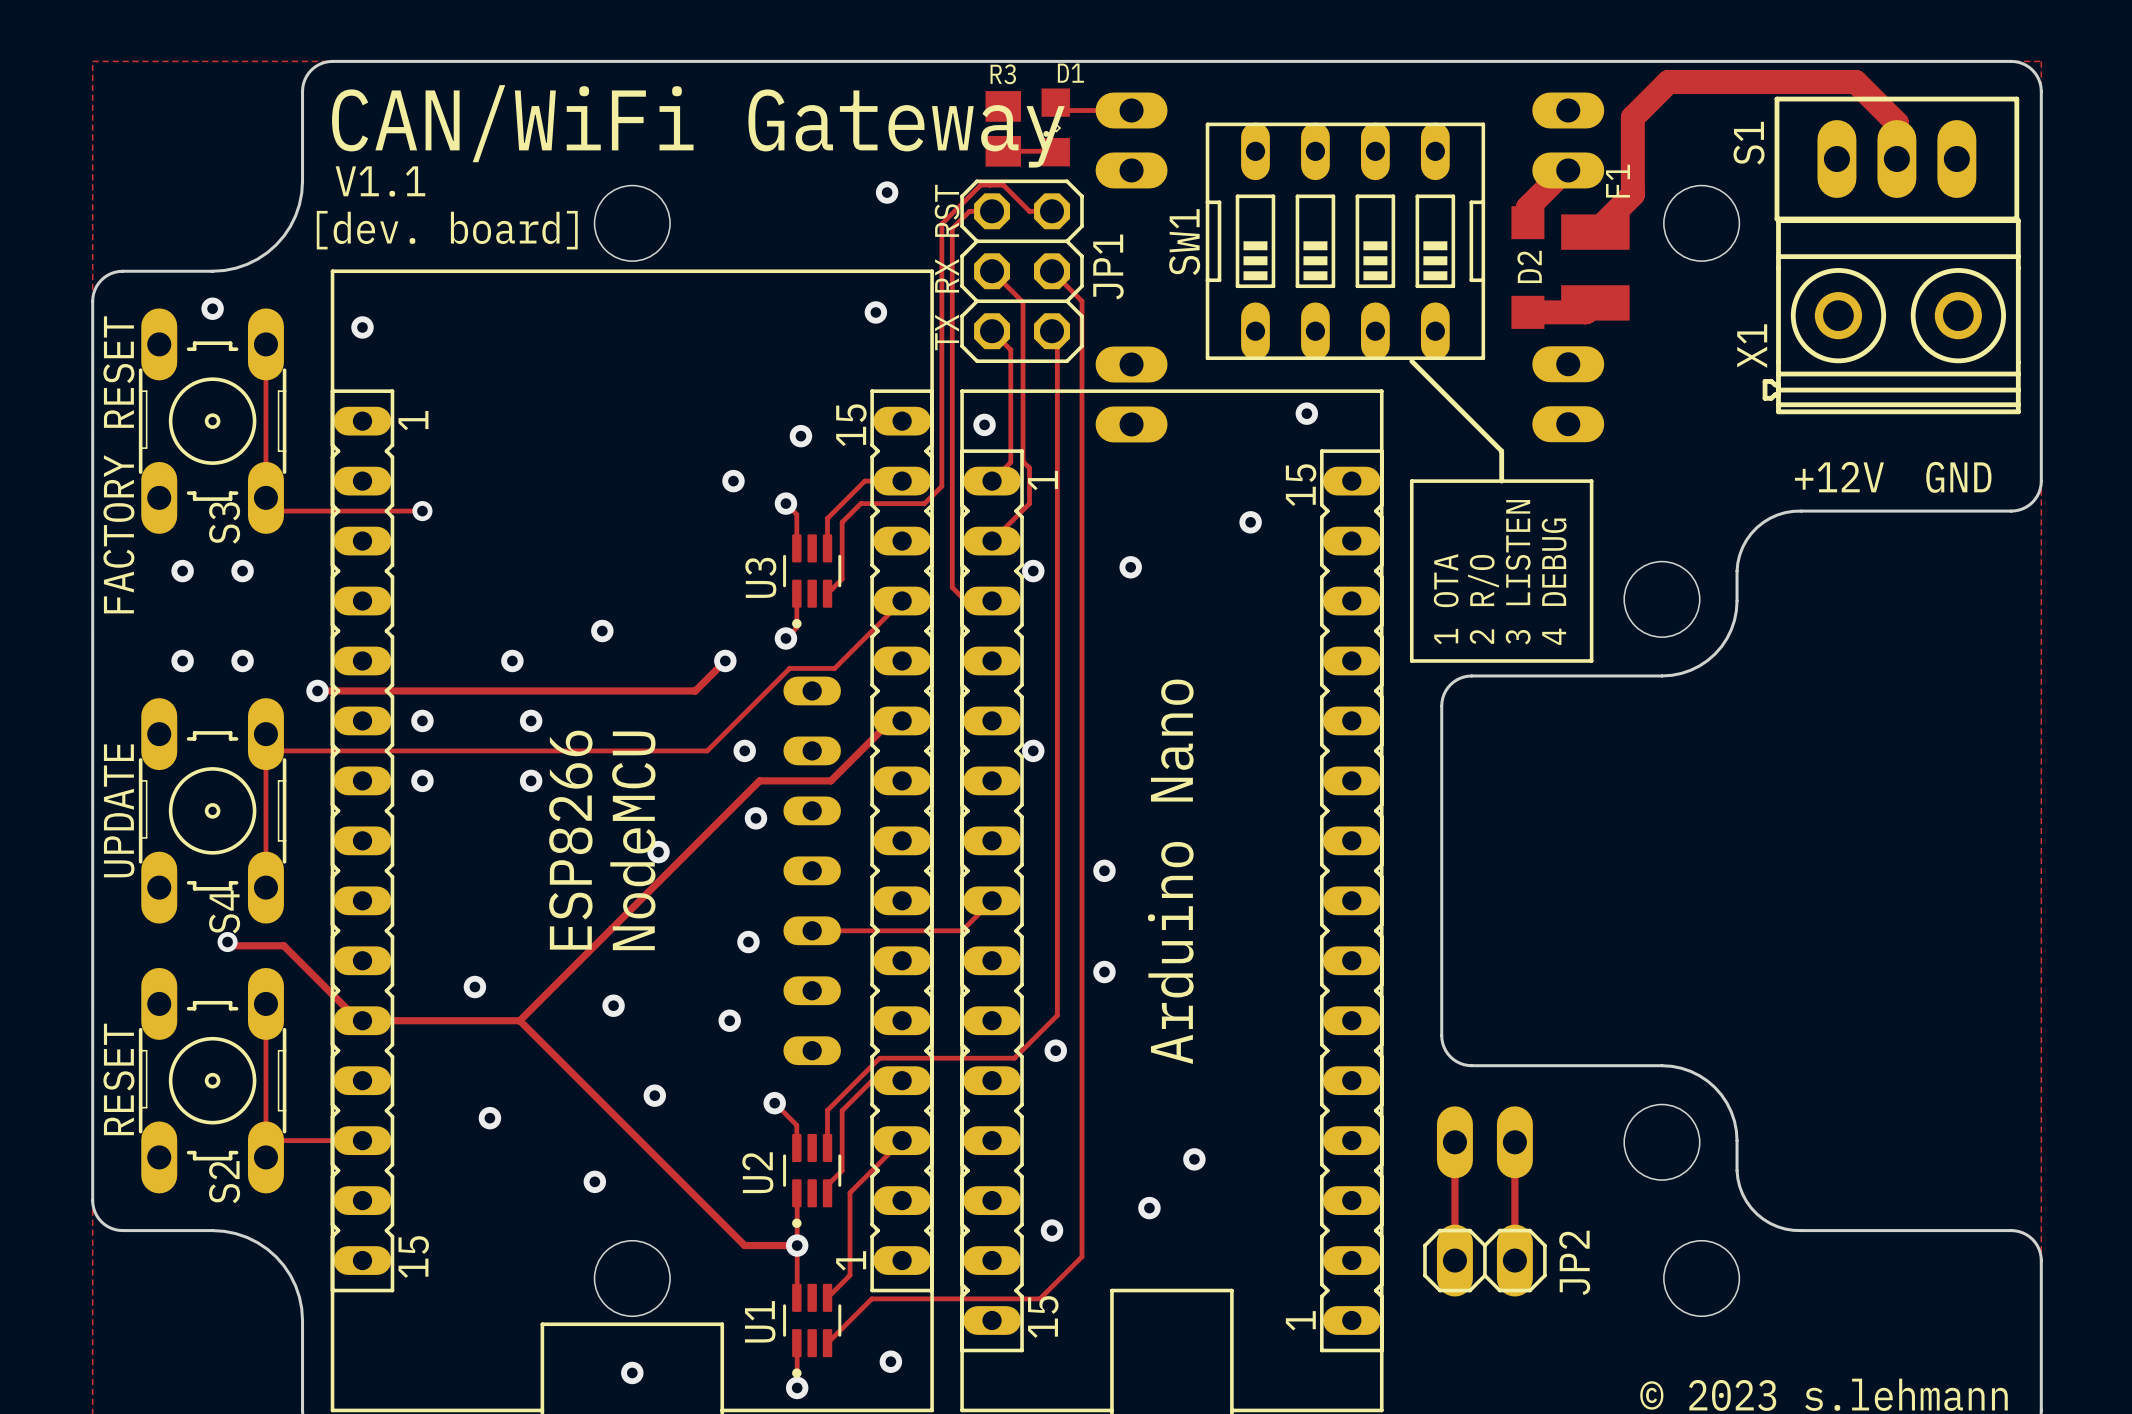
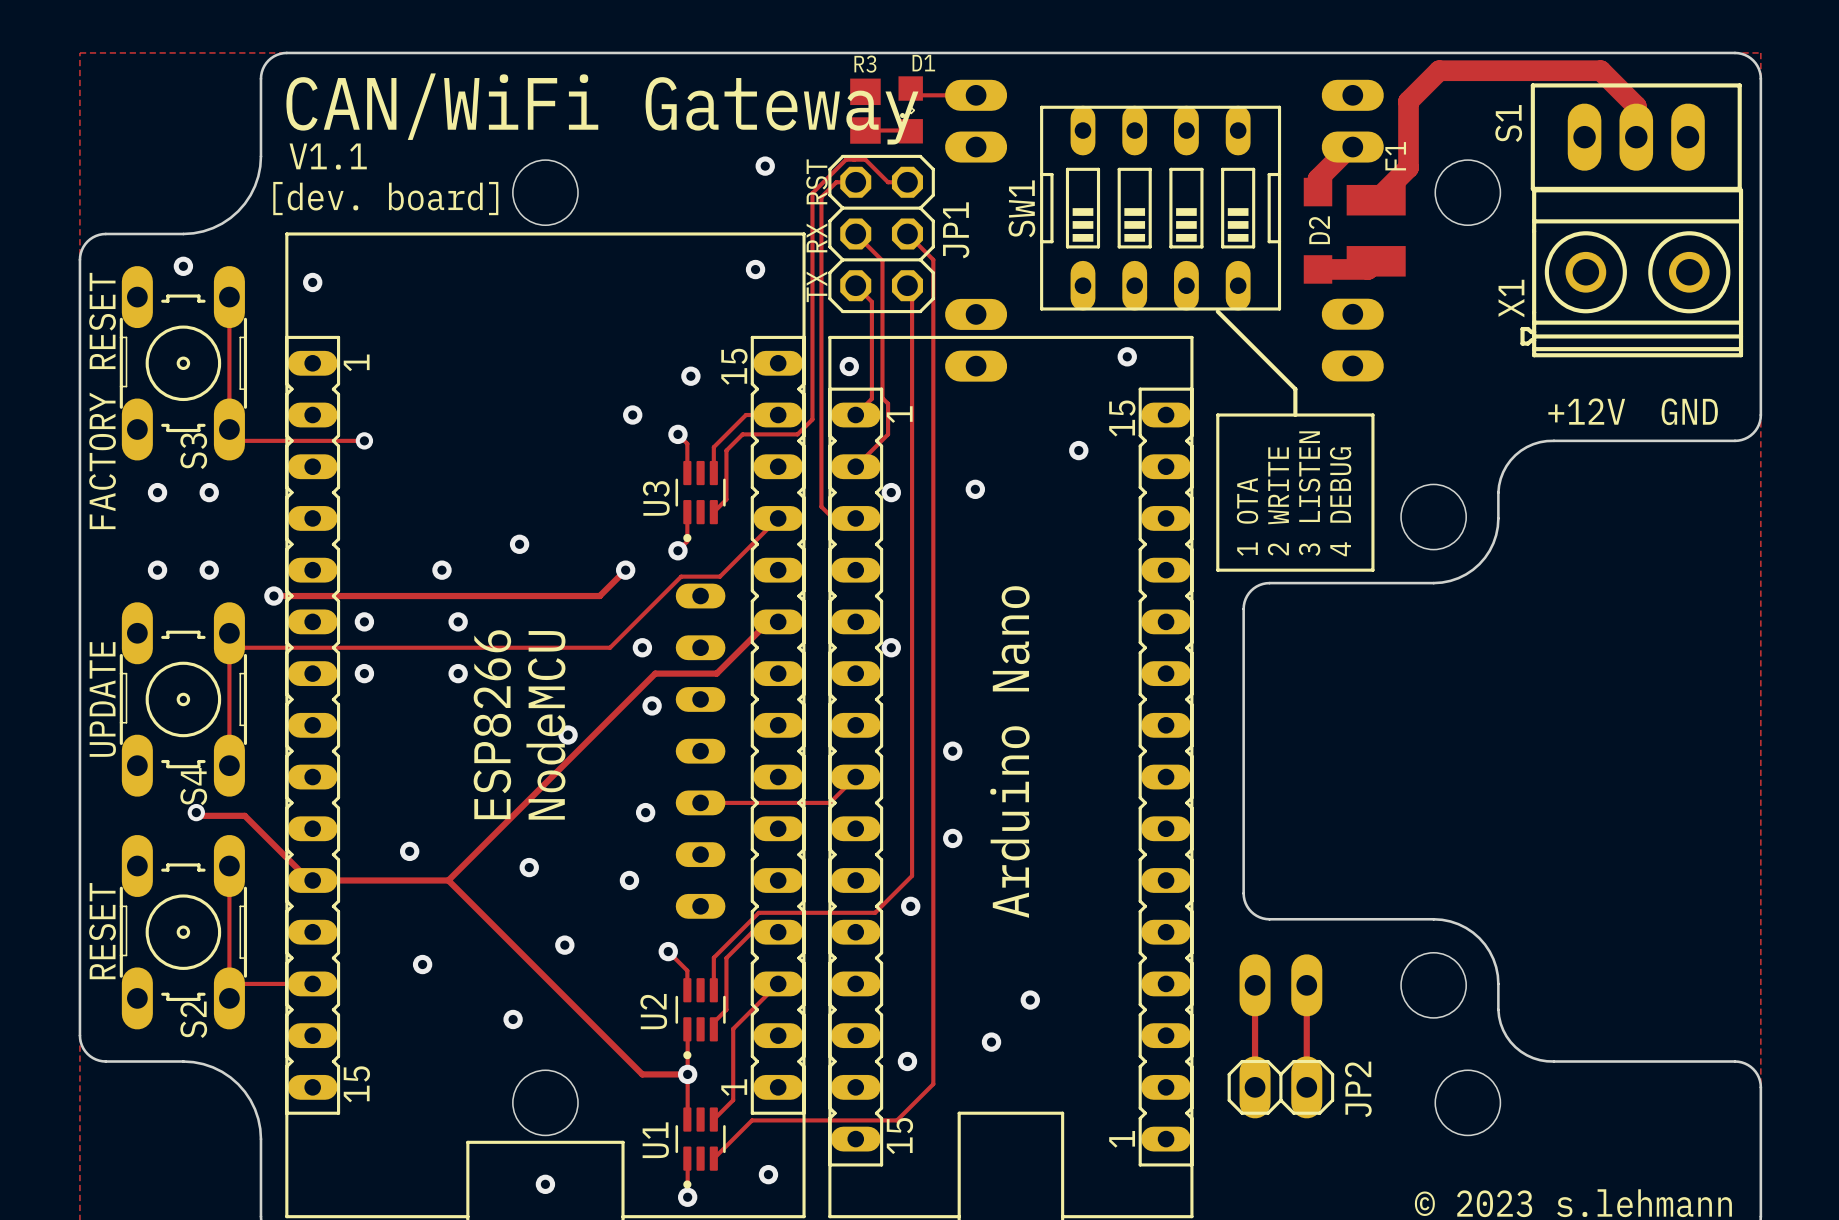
text: 2 R/O (1483, 599) -> 2 WRITE (1278, 501)

